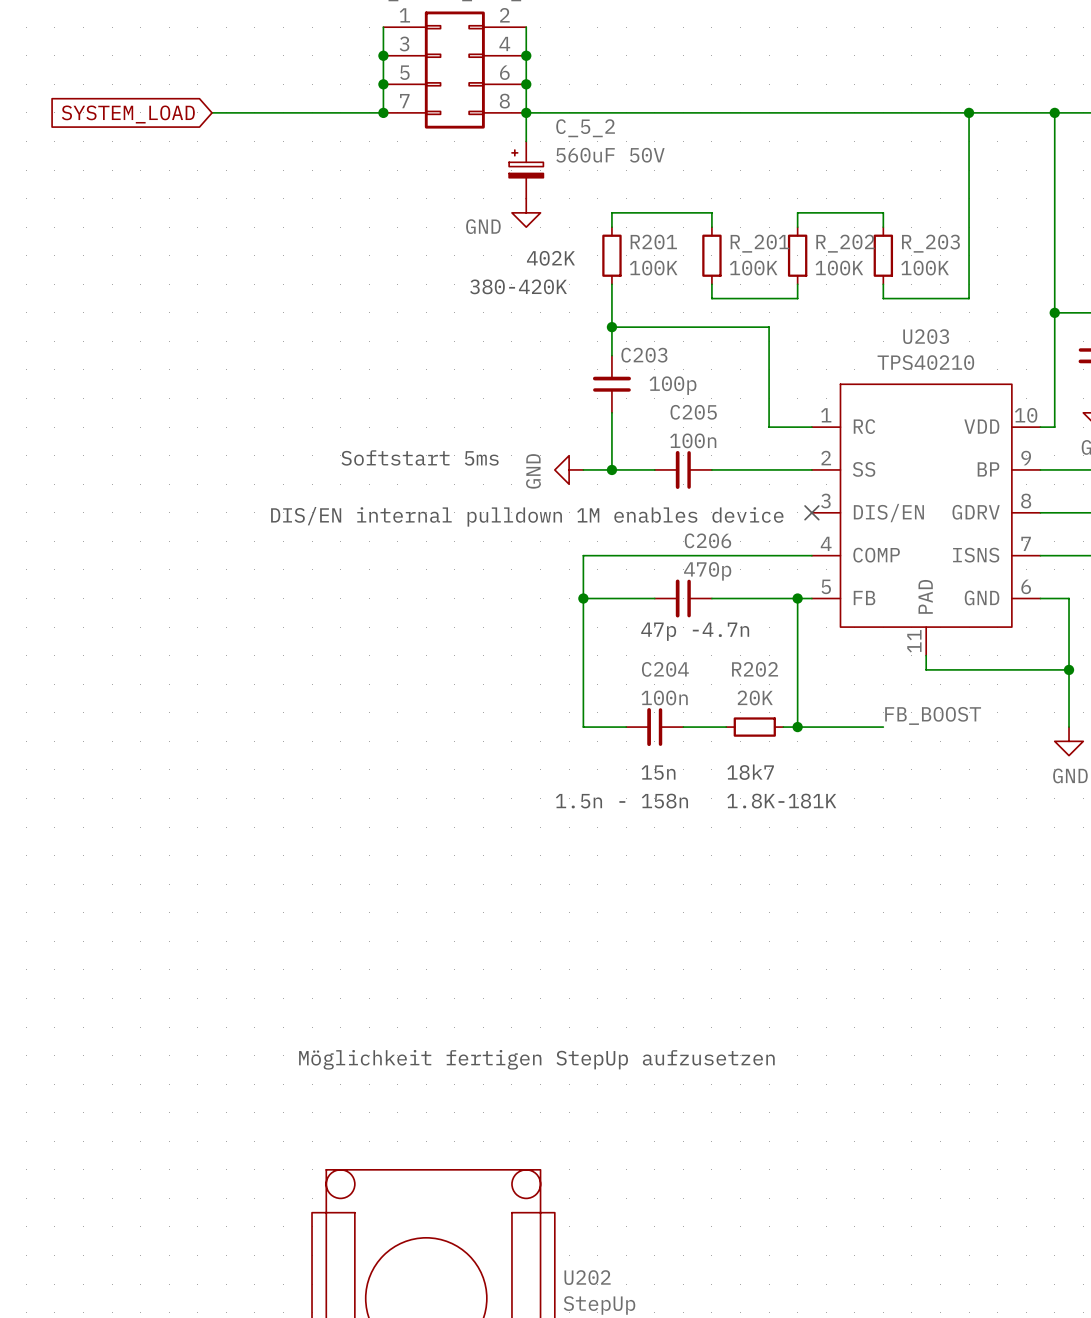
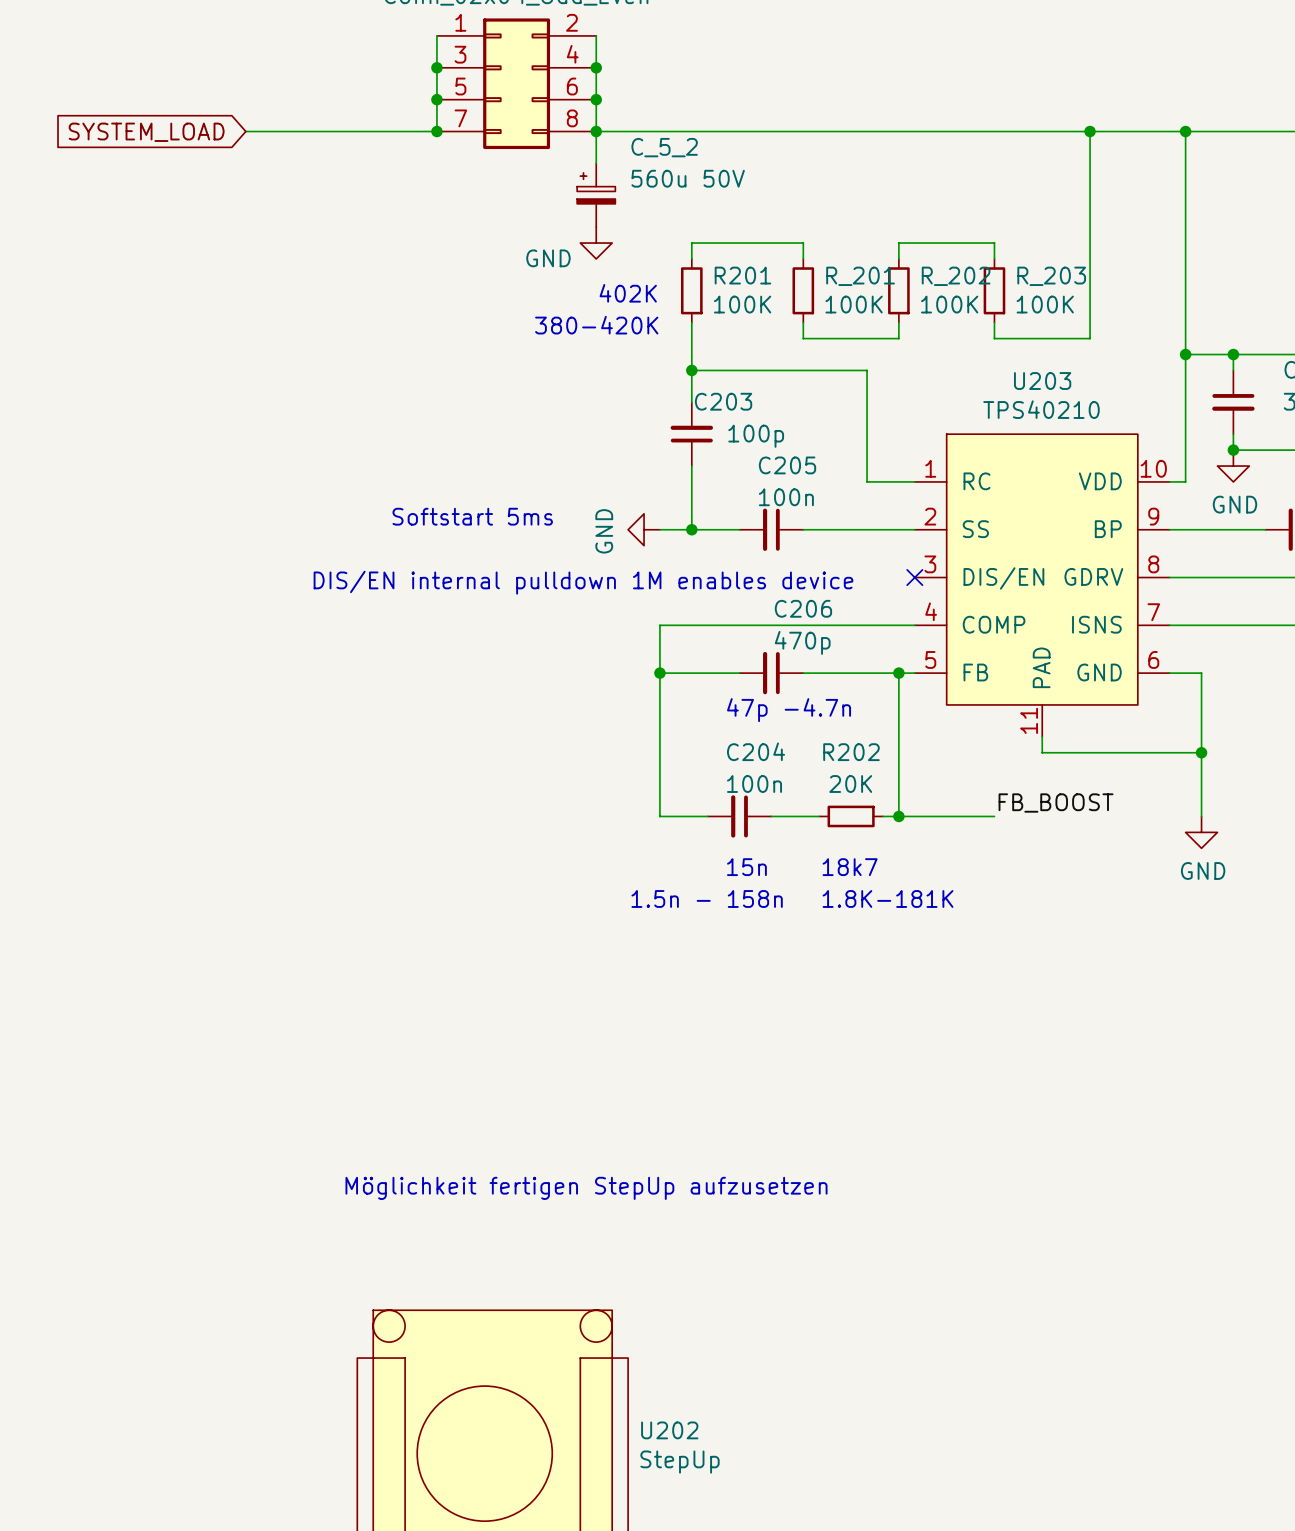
C_5_2 value: 560uF 50V (610, 155) -> 560u 50V (688, 178)

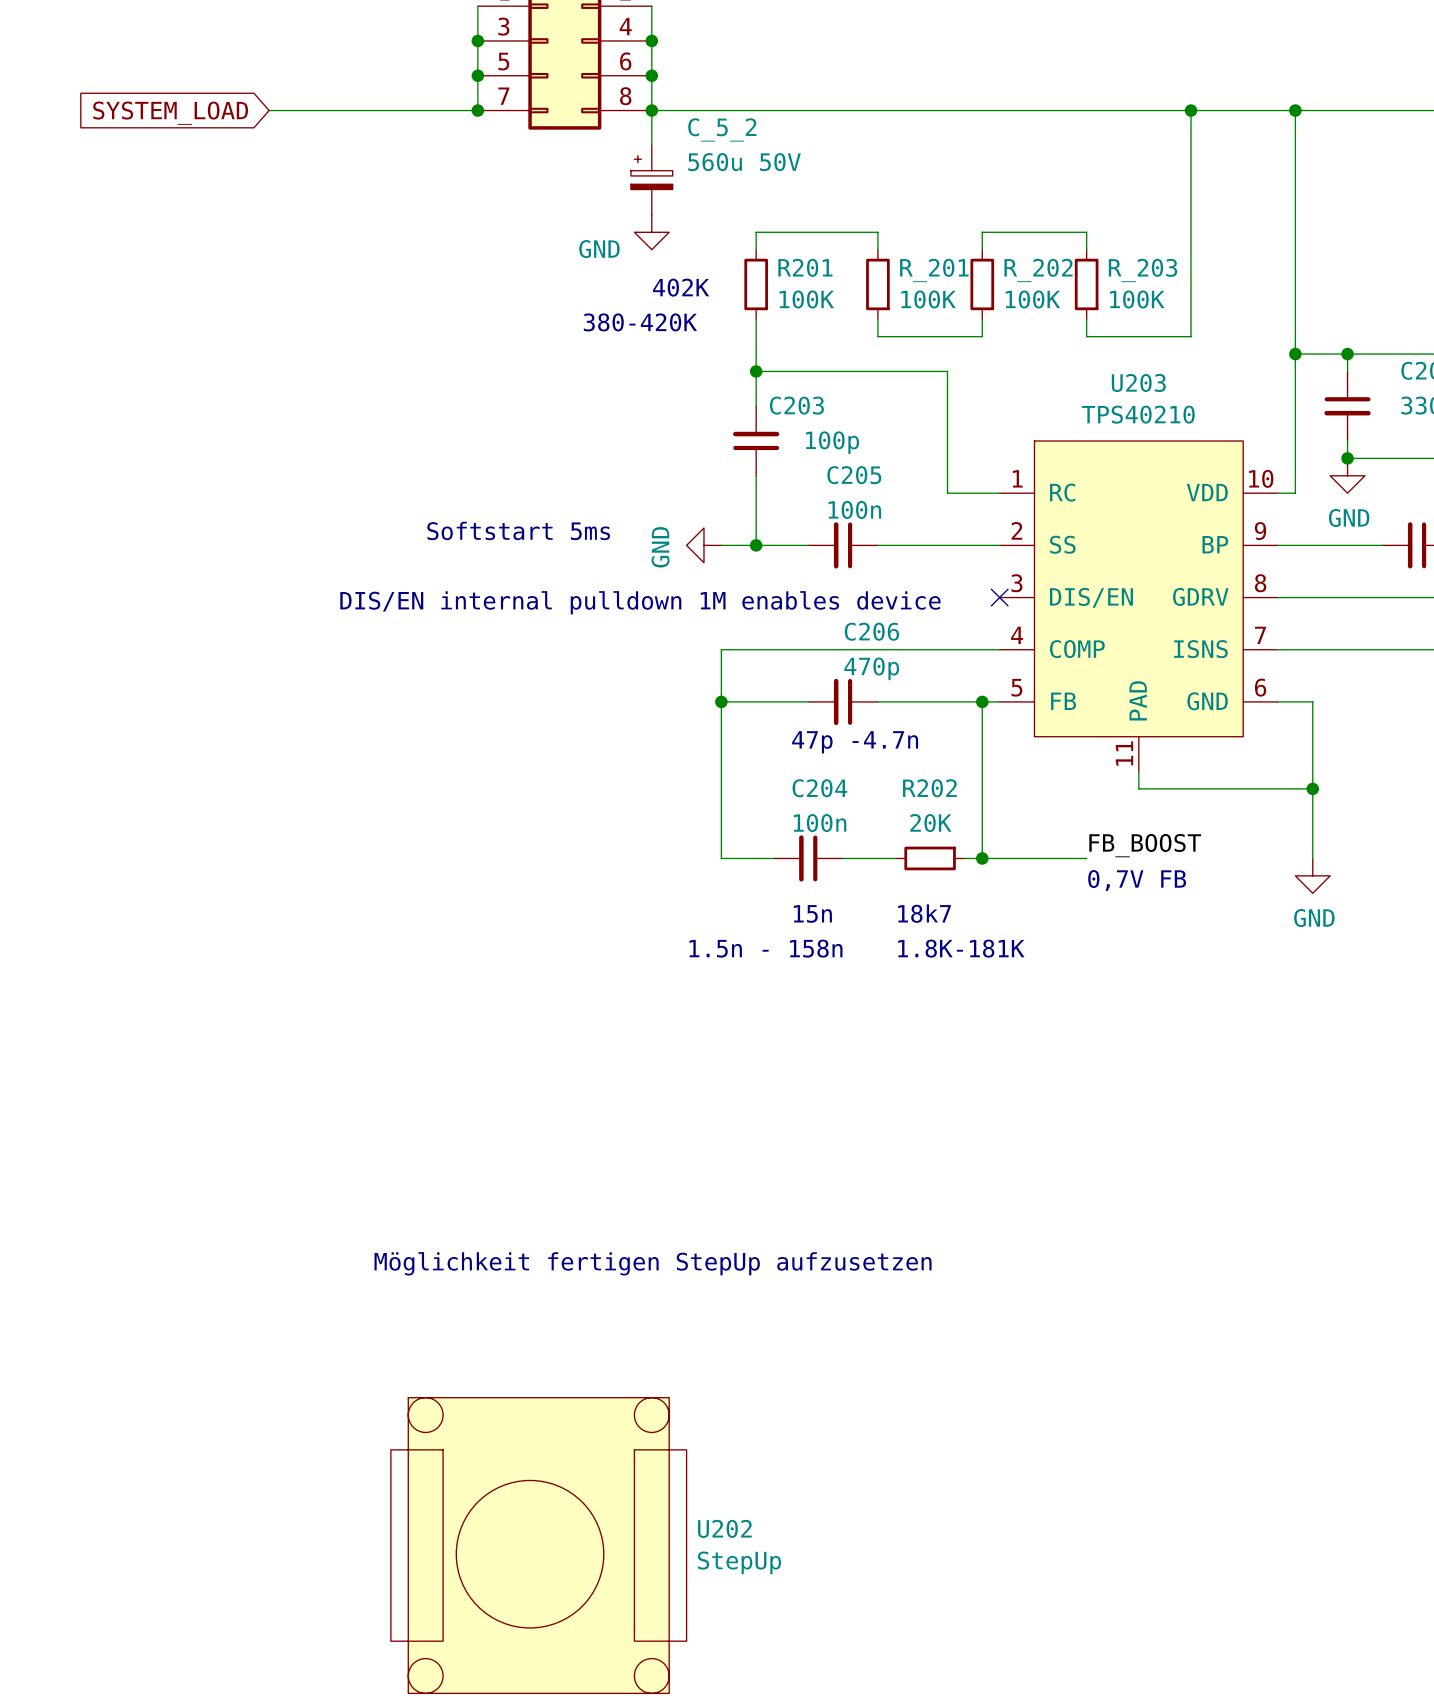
text: none -> 0,7V FB (1137, 880)

